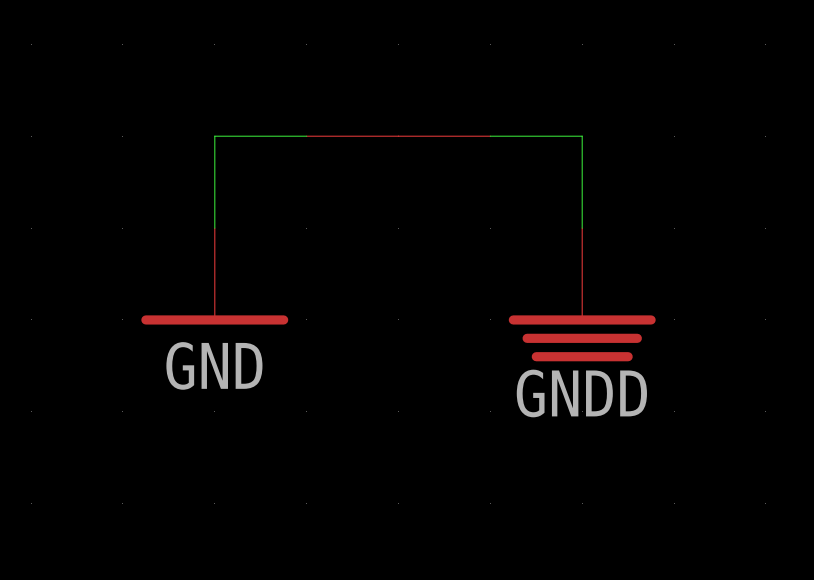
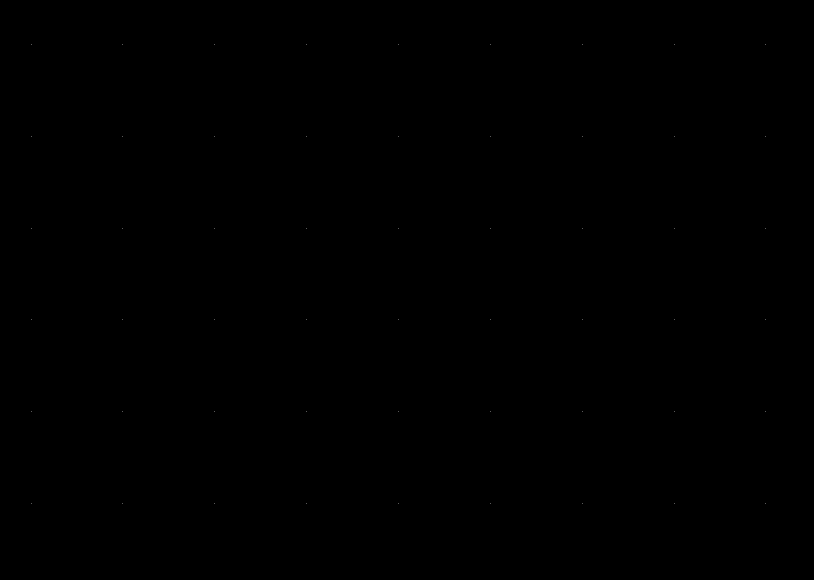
wire: (306, 136) (214, 136) (214, 228) -> none
part: (398, 136) -> none
wire: (490, 136) (582, 136) (582, 228) -> none
power symbol: GND (214, 276) -> none
power symbol: GNDD (582, 294) -> none

